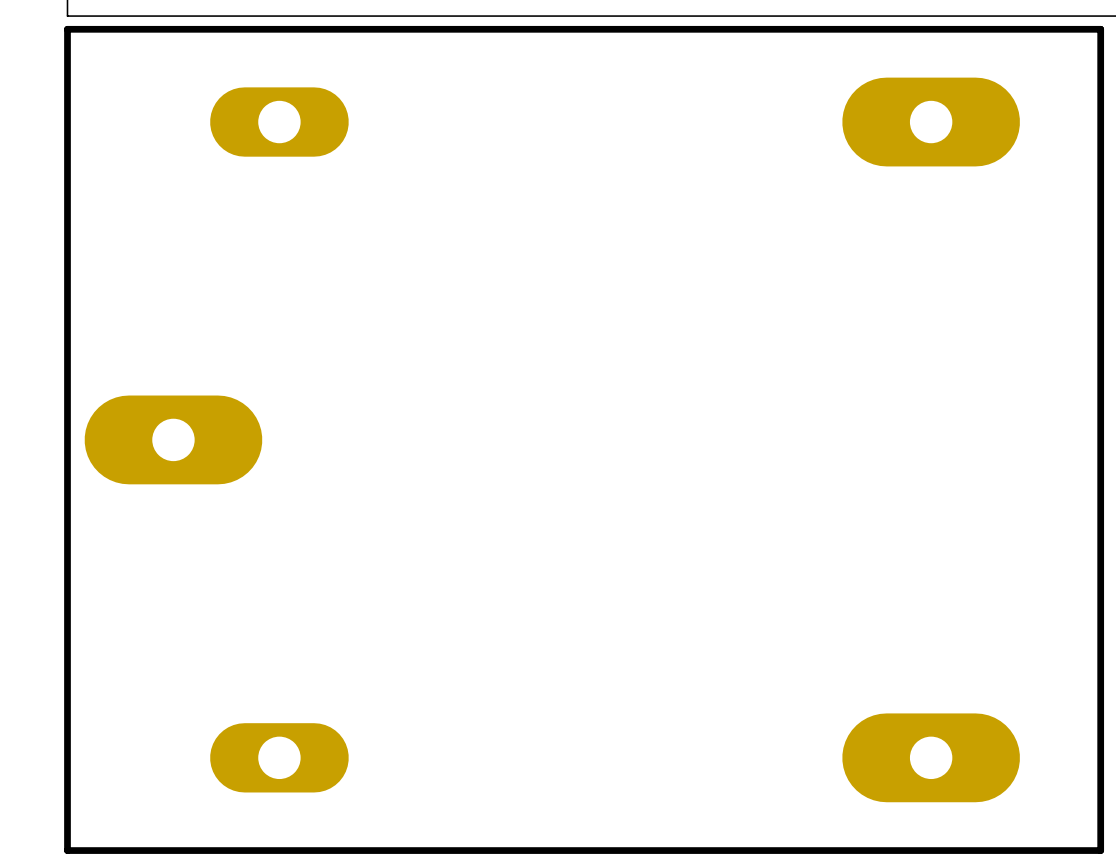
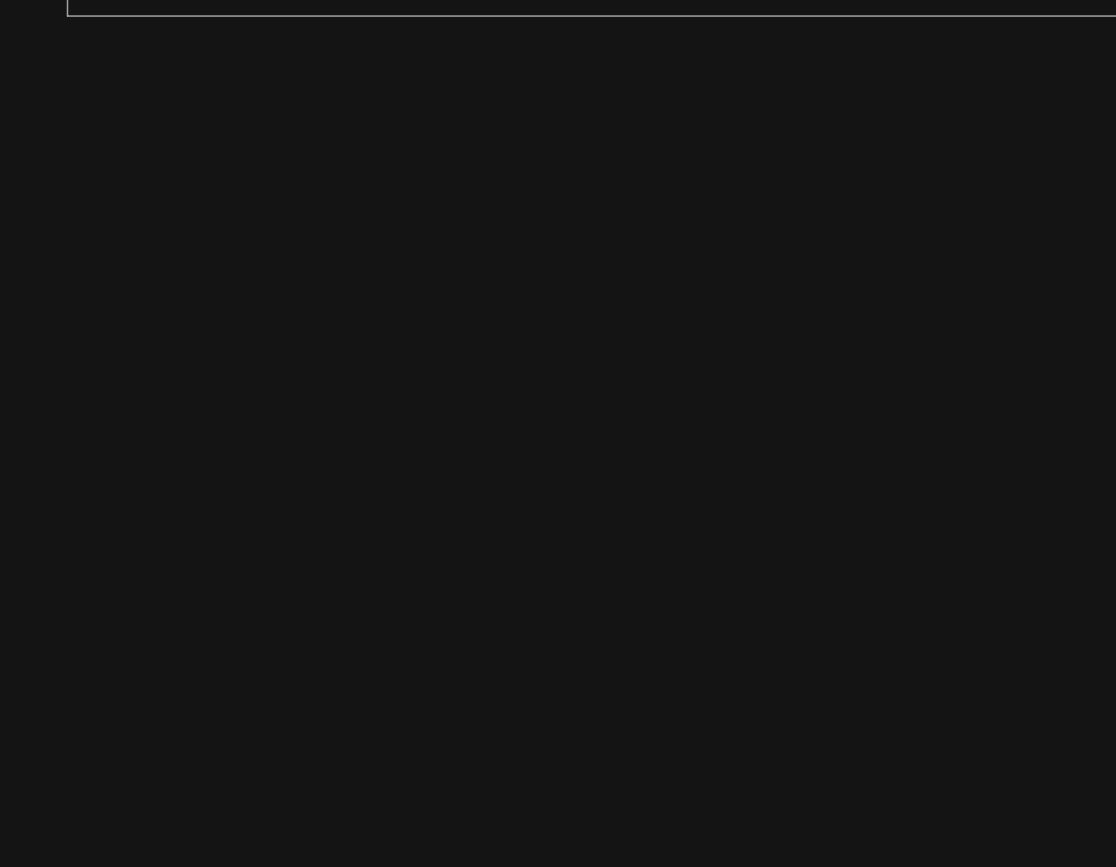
part: (584, 439) -> none

